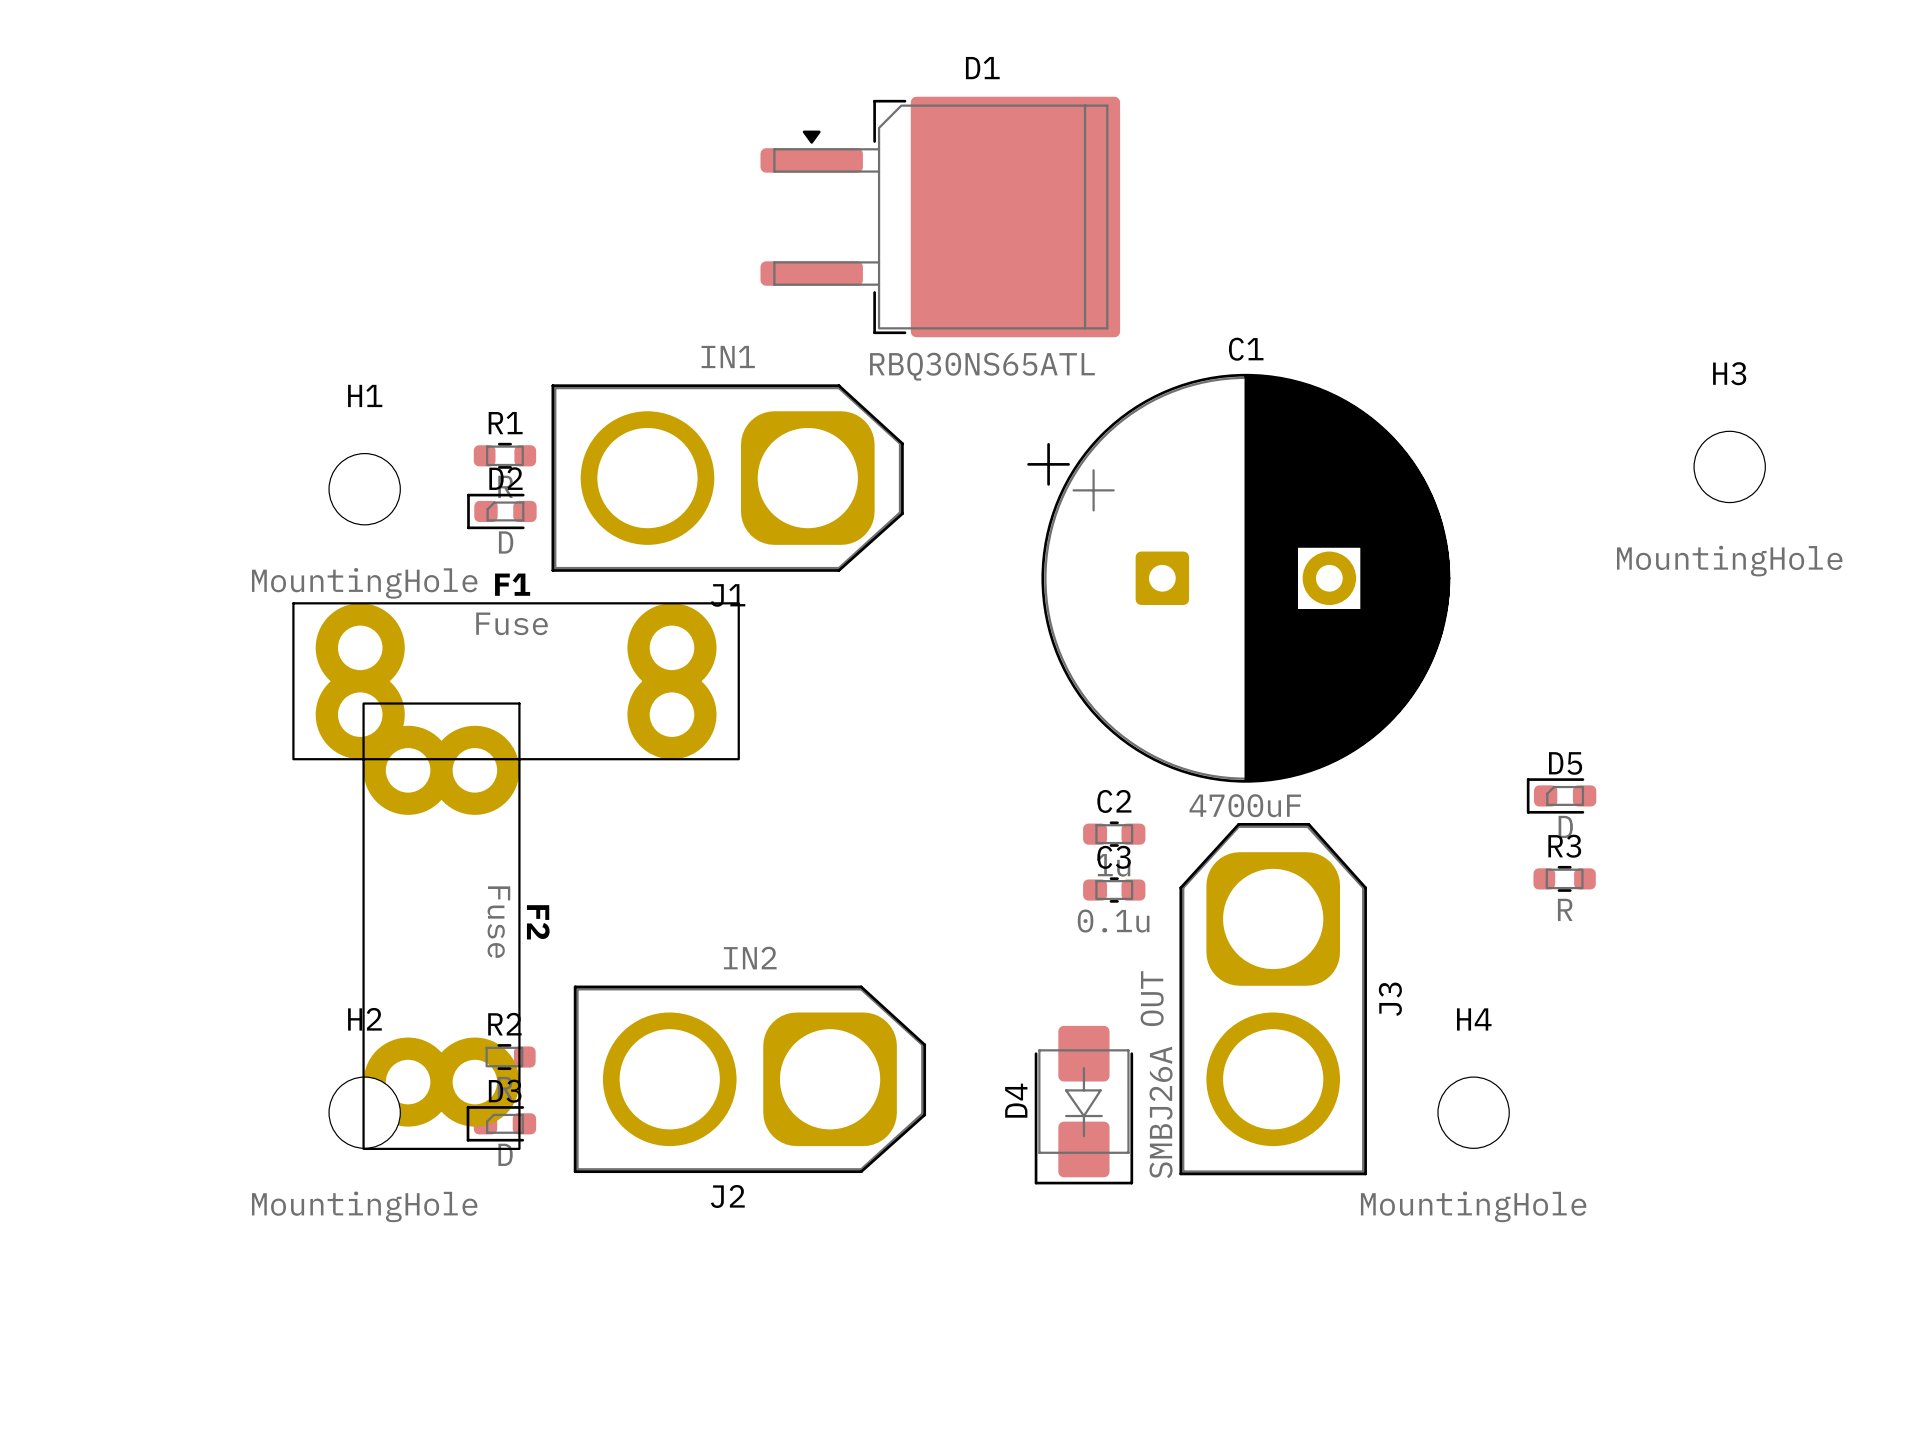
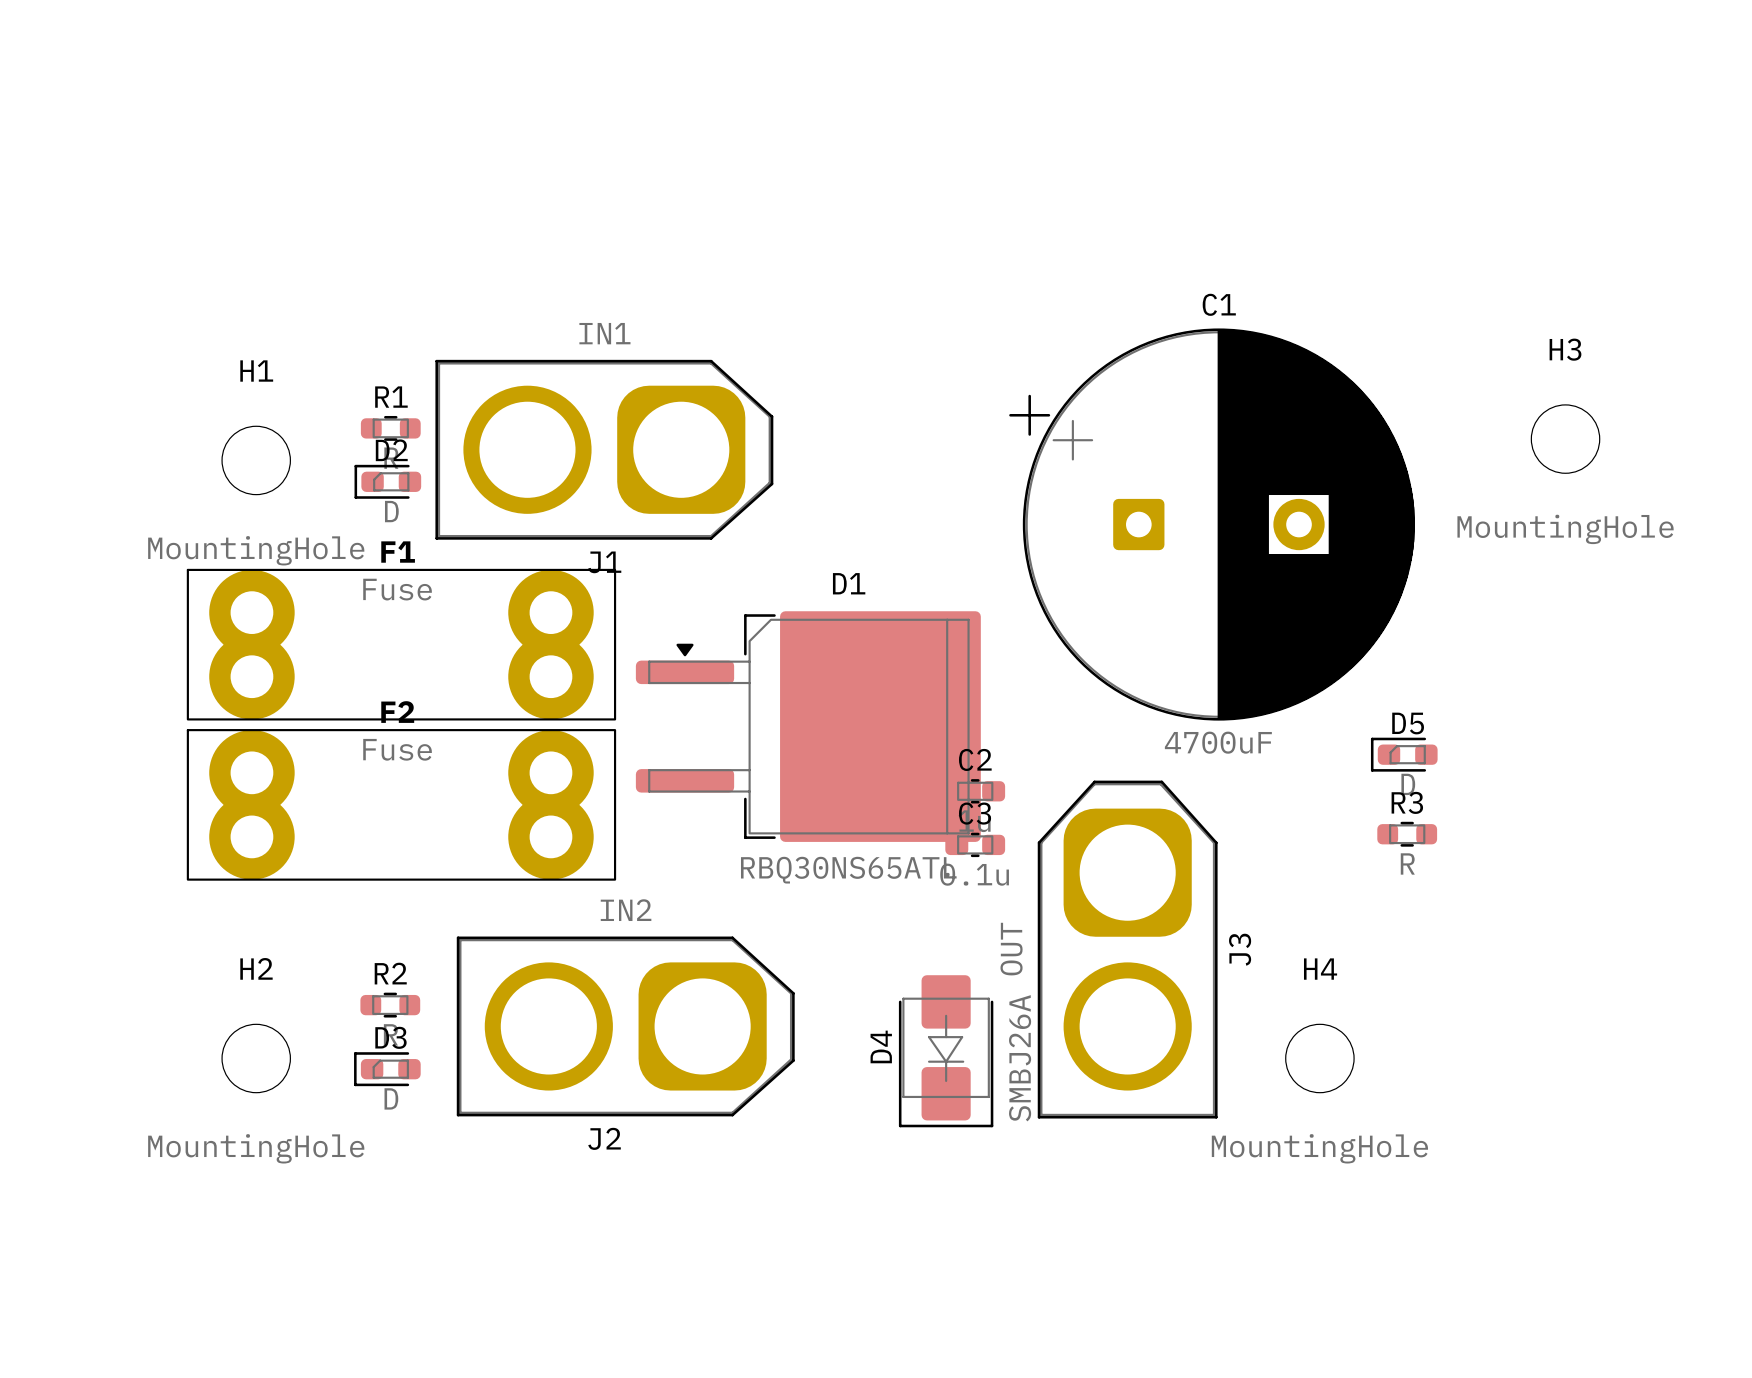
D1 position: (940, 216) -> (808, 726)
C1 position: (1238, 578) -> (1212, 524)
F2 value position: Fuse (498, 922) -> Fuse (397, 749)
F2 name position: F2 (538, 922) -> F2 (397, 712)
F2 rotation: 0° (441, 926) -> 90° clockwise (401, 804)

